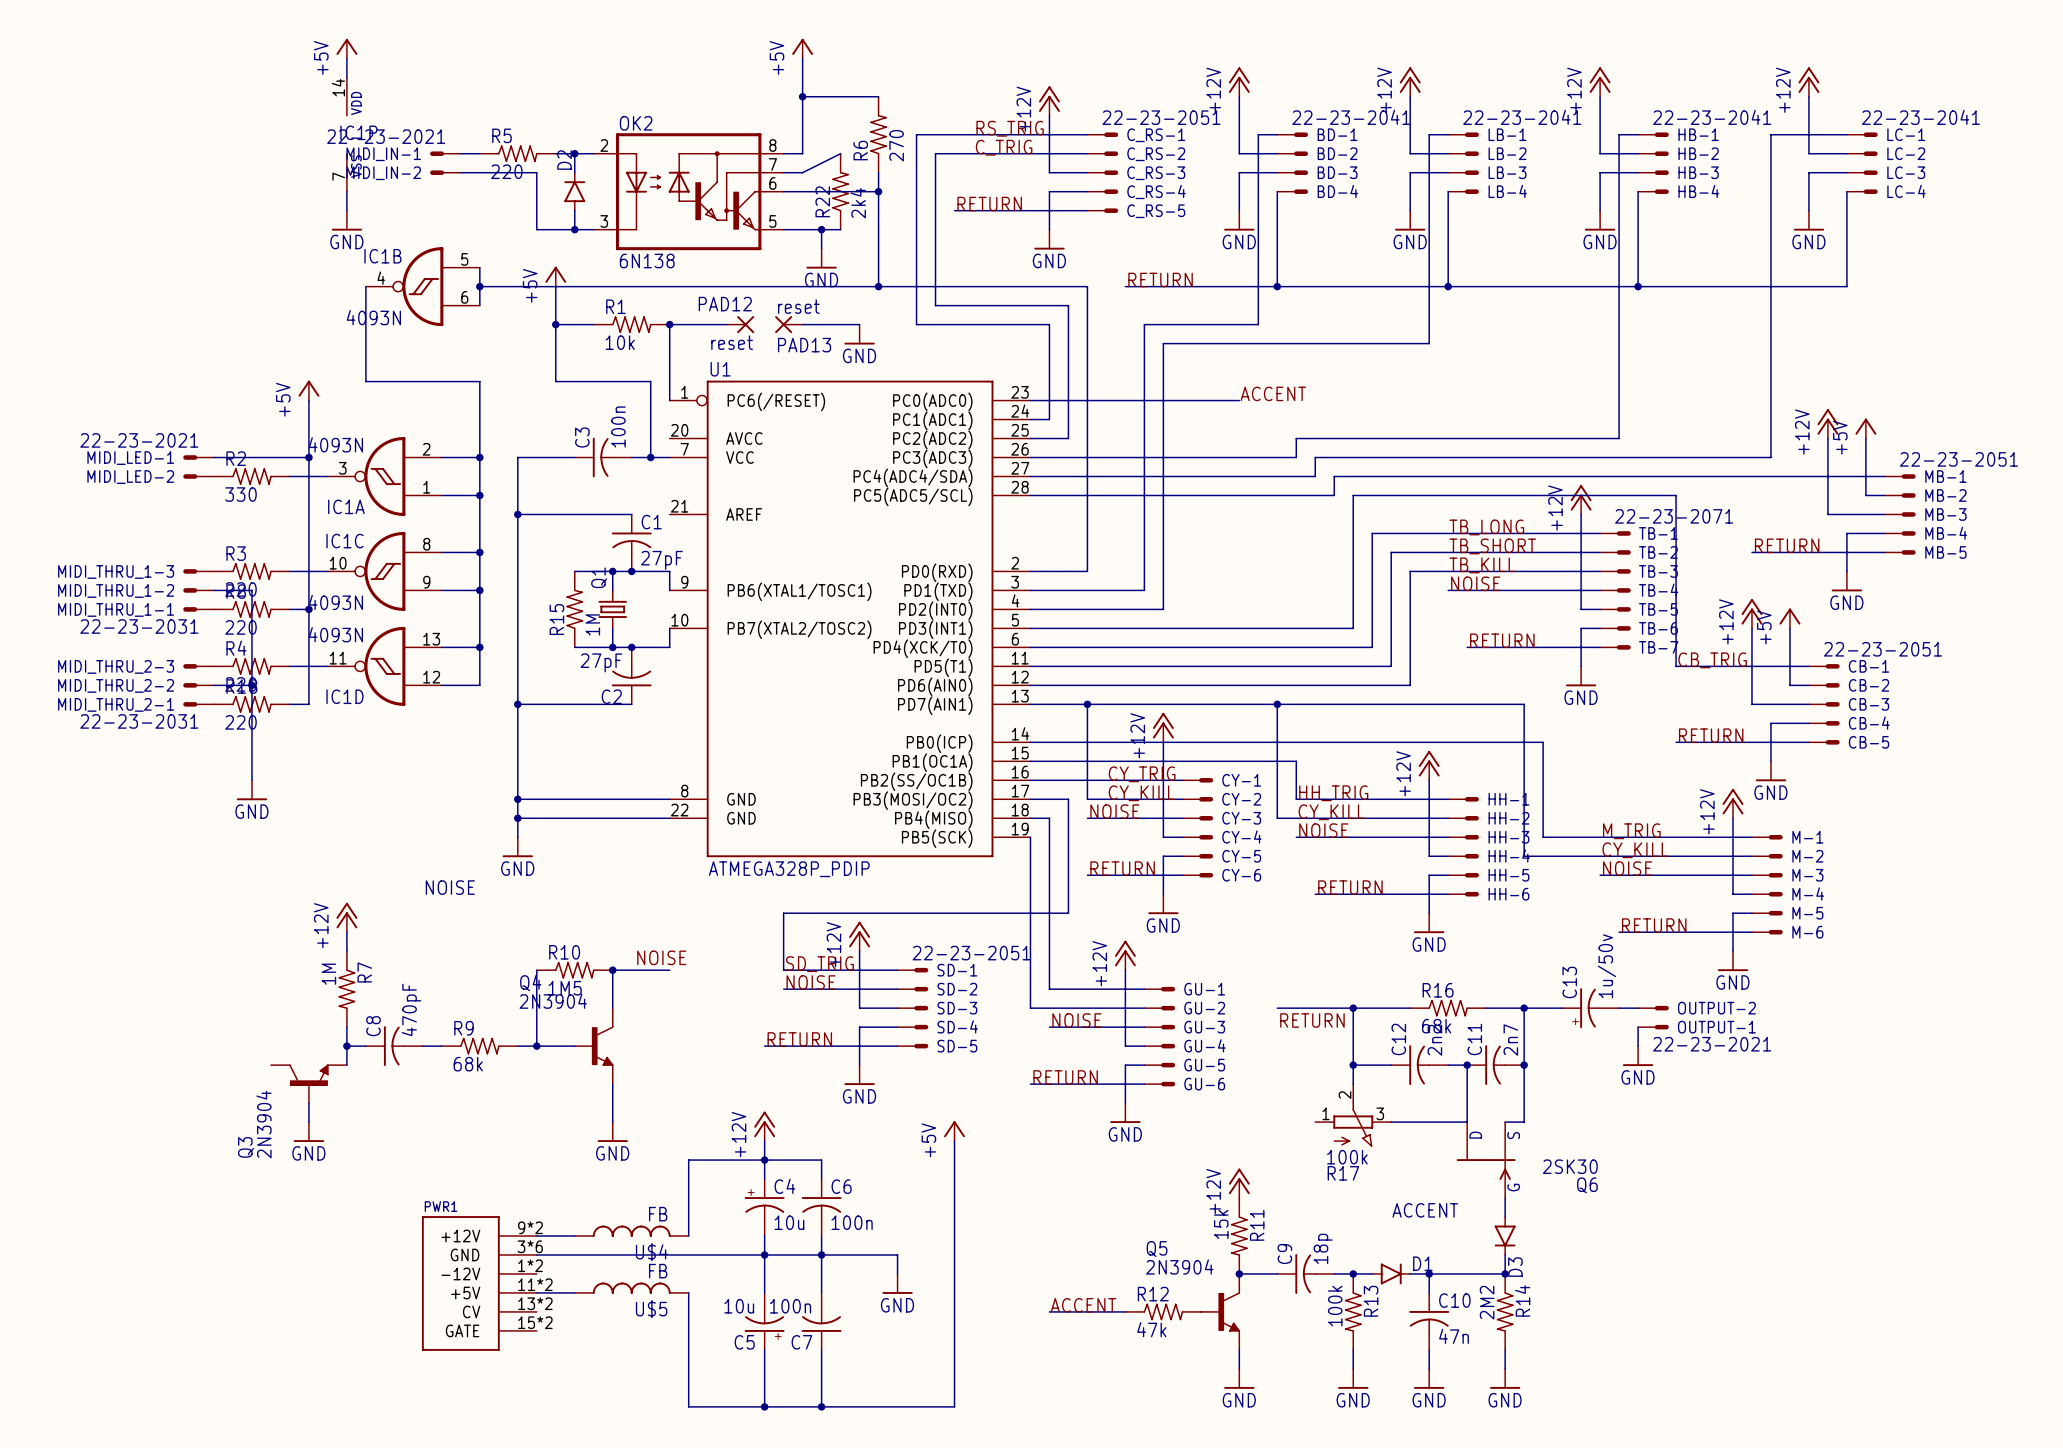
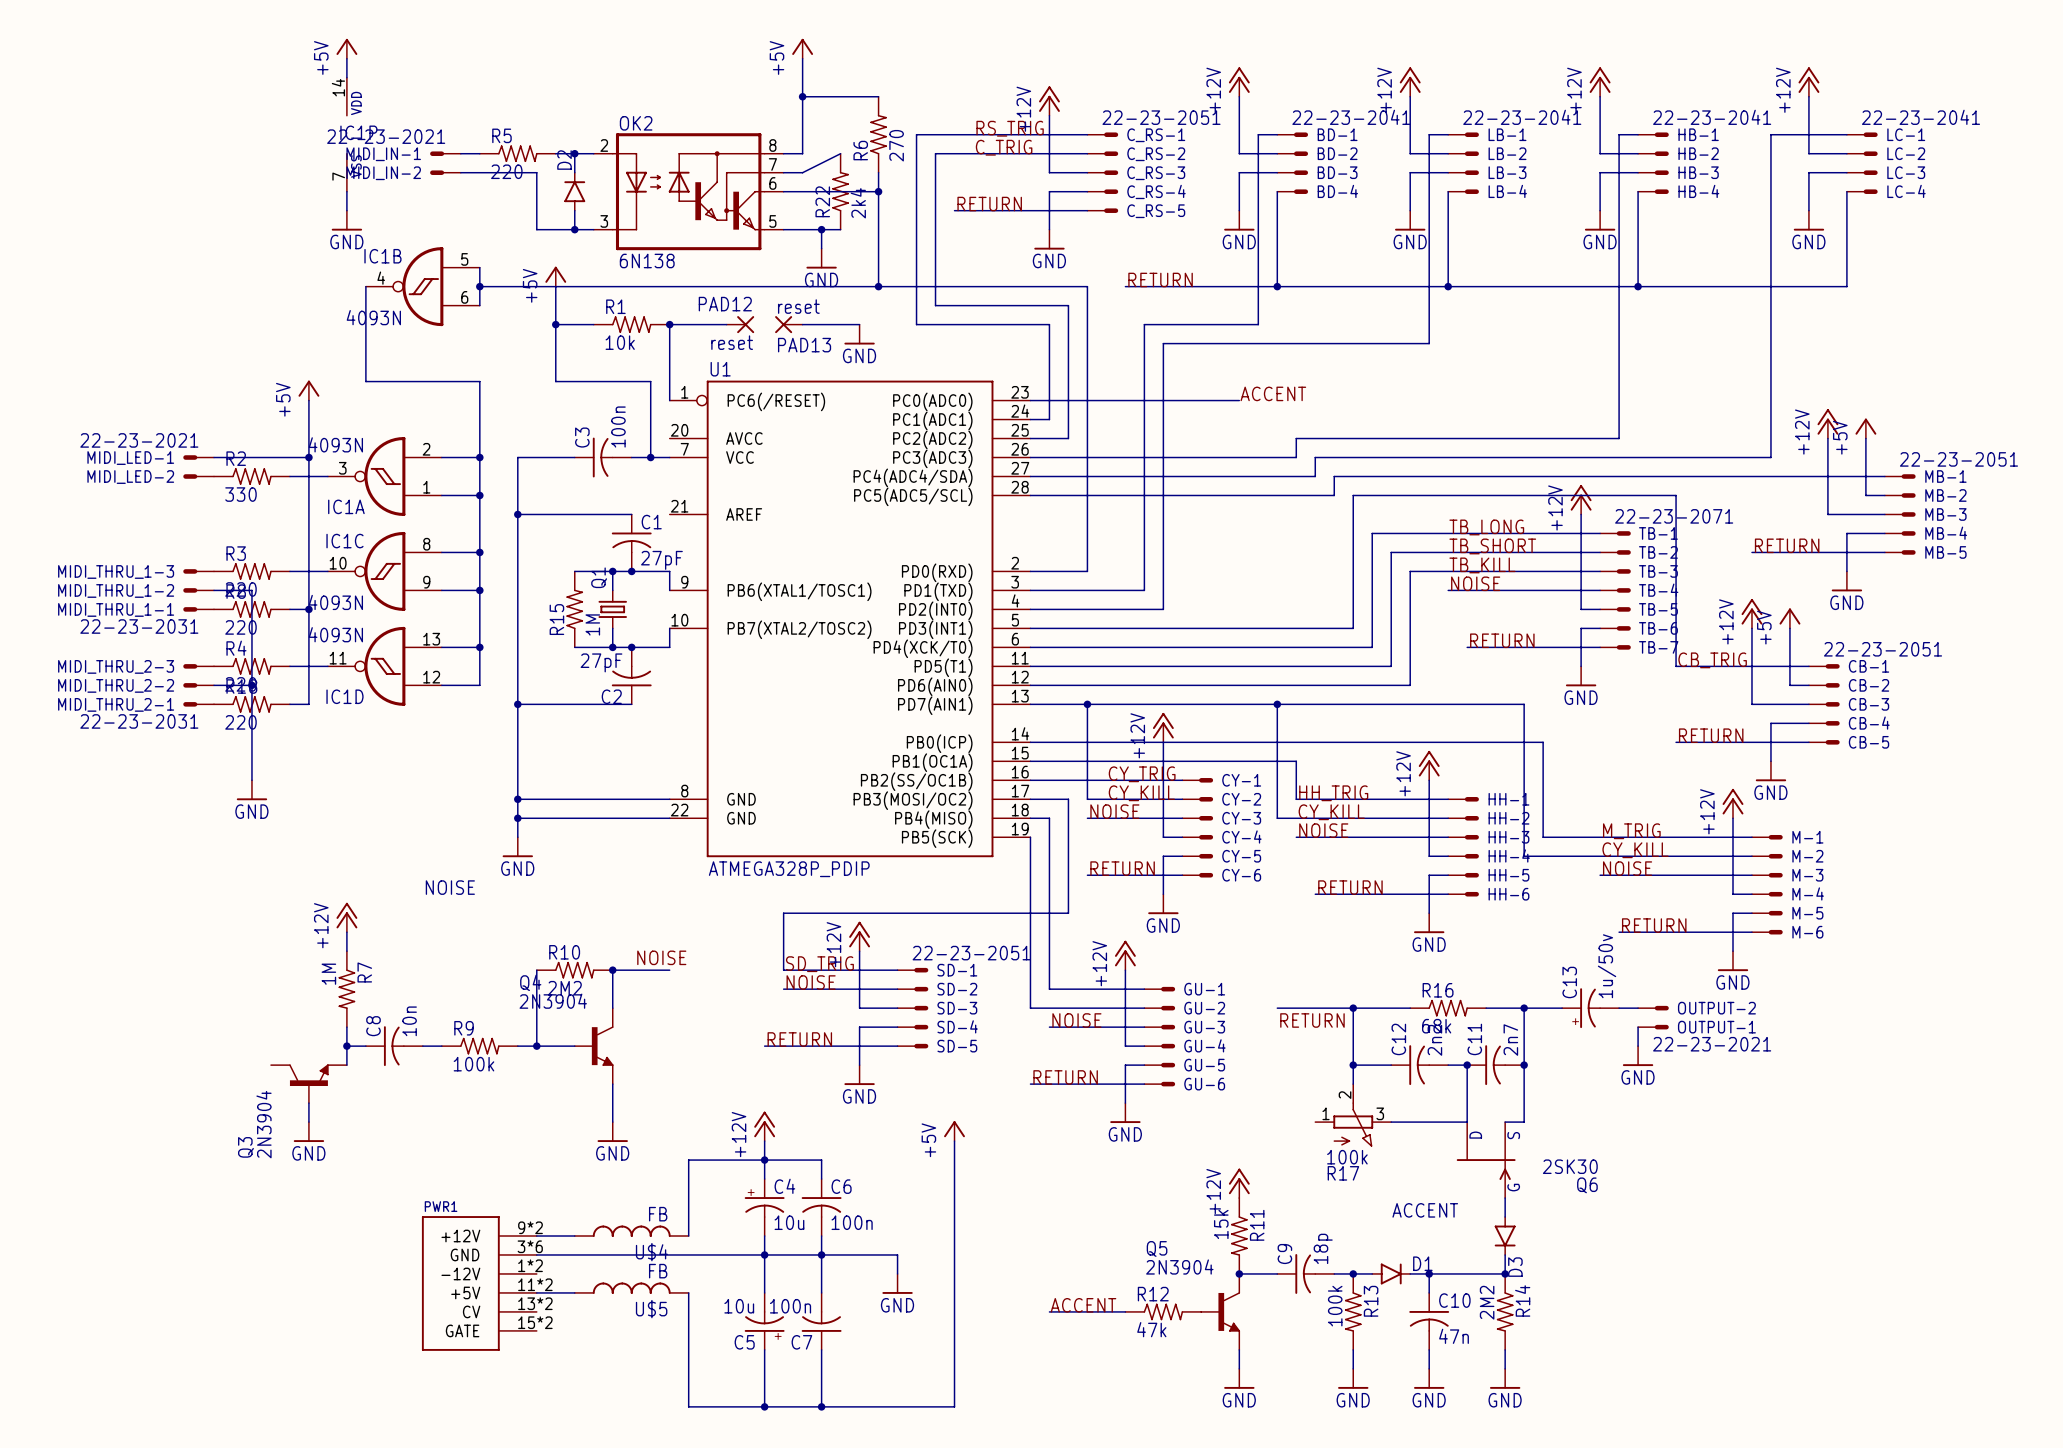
R10 value: 1M5 (565, 988) -> 2M2 (564, 988)
C8 value: 470pF (411, 1009) -> 10n (409, 1021)
R9 value: 68k (468, 1064) -> 100k (473, 1064)

